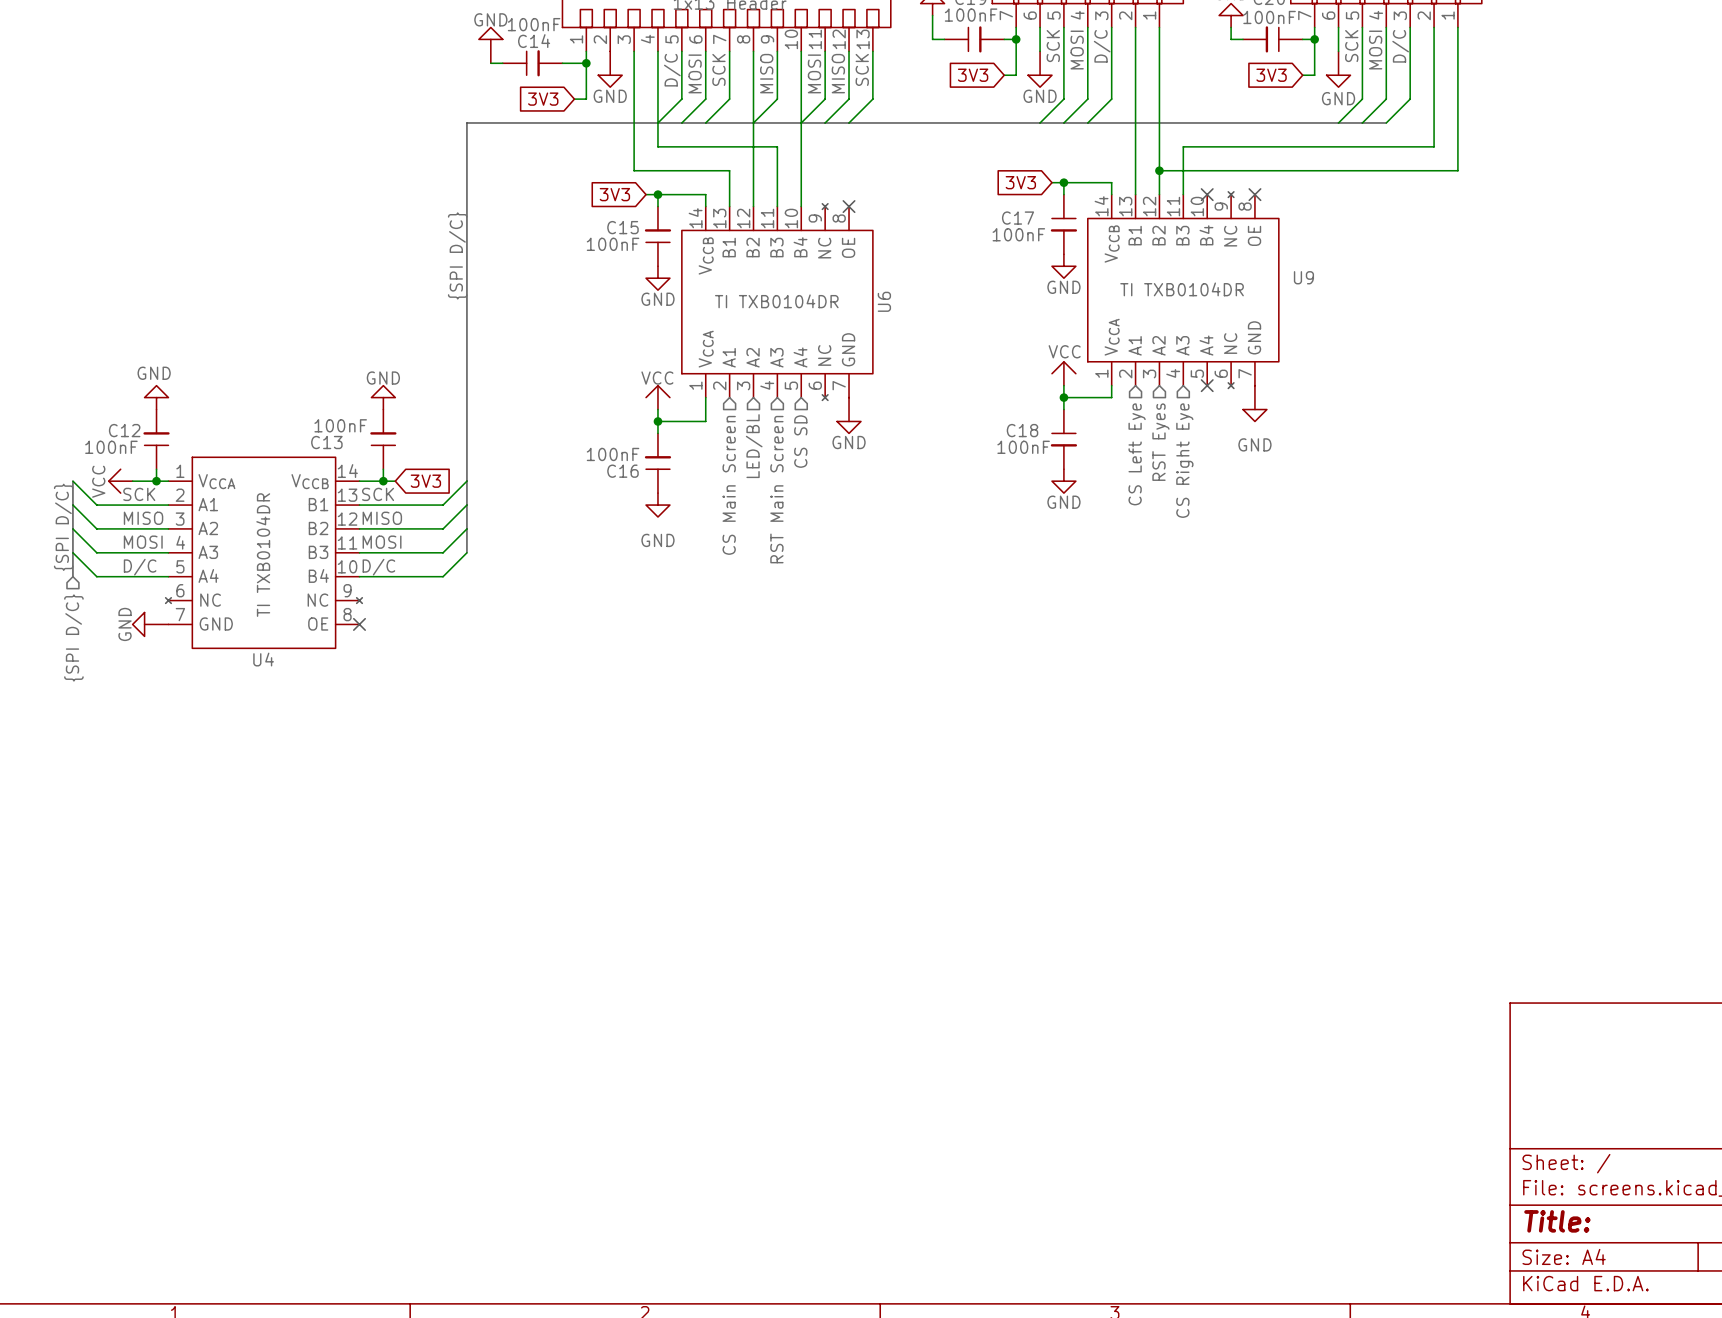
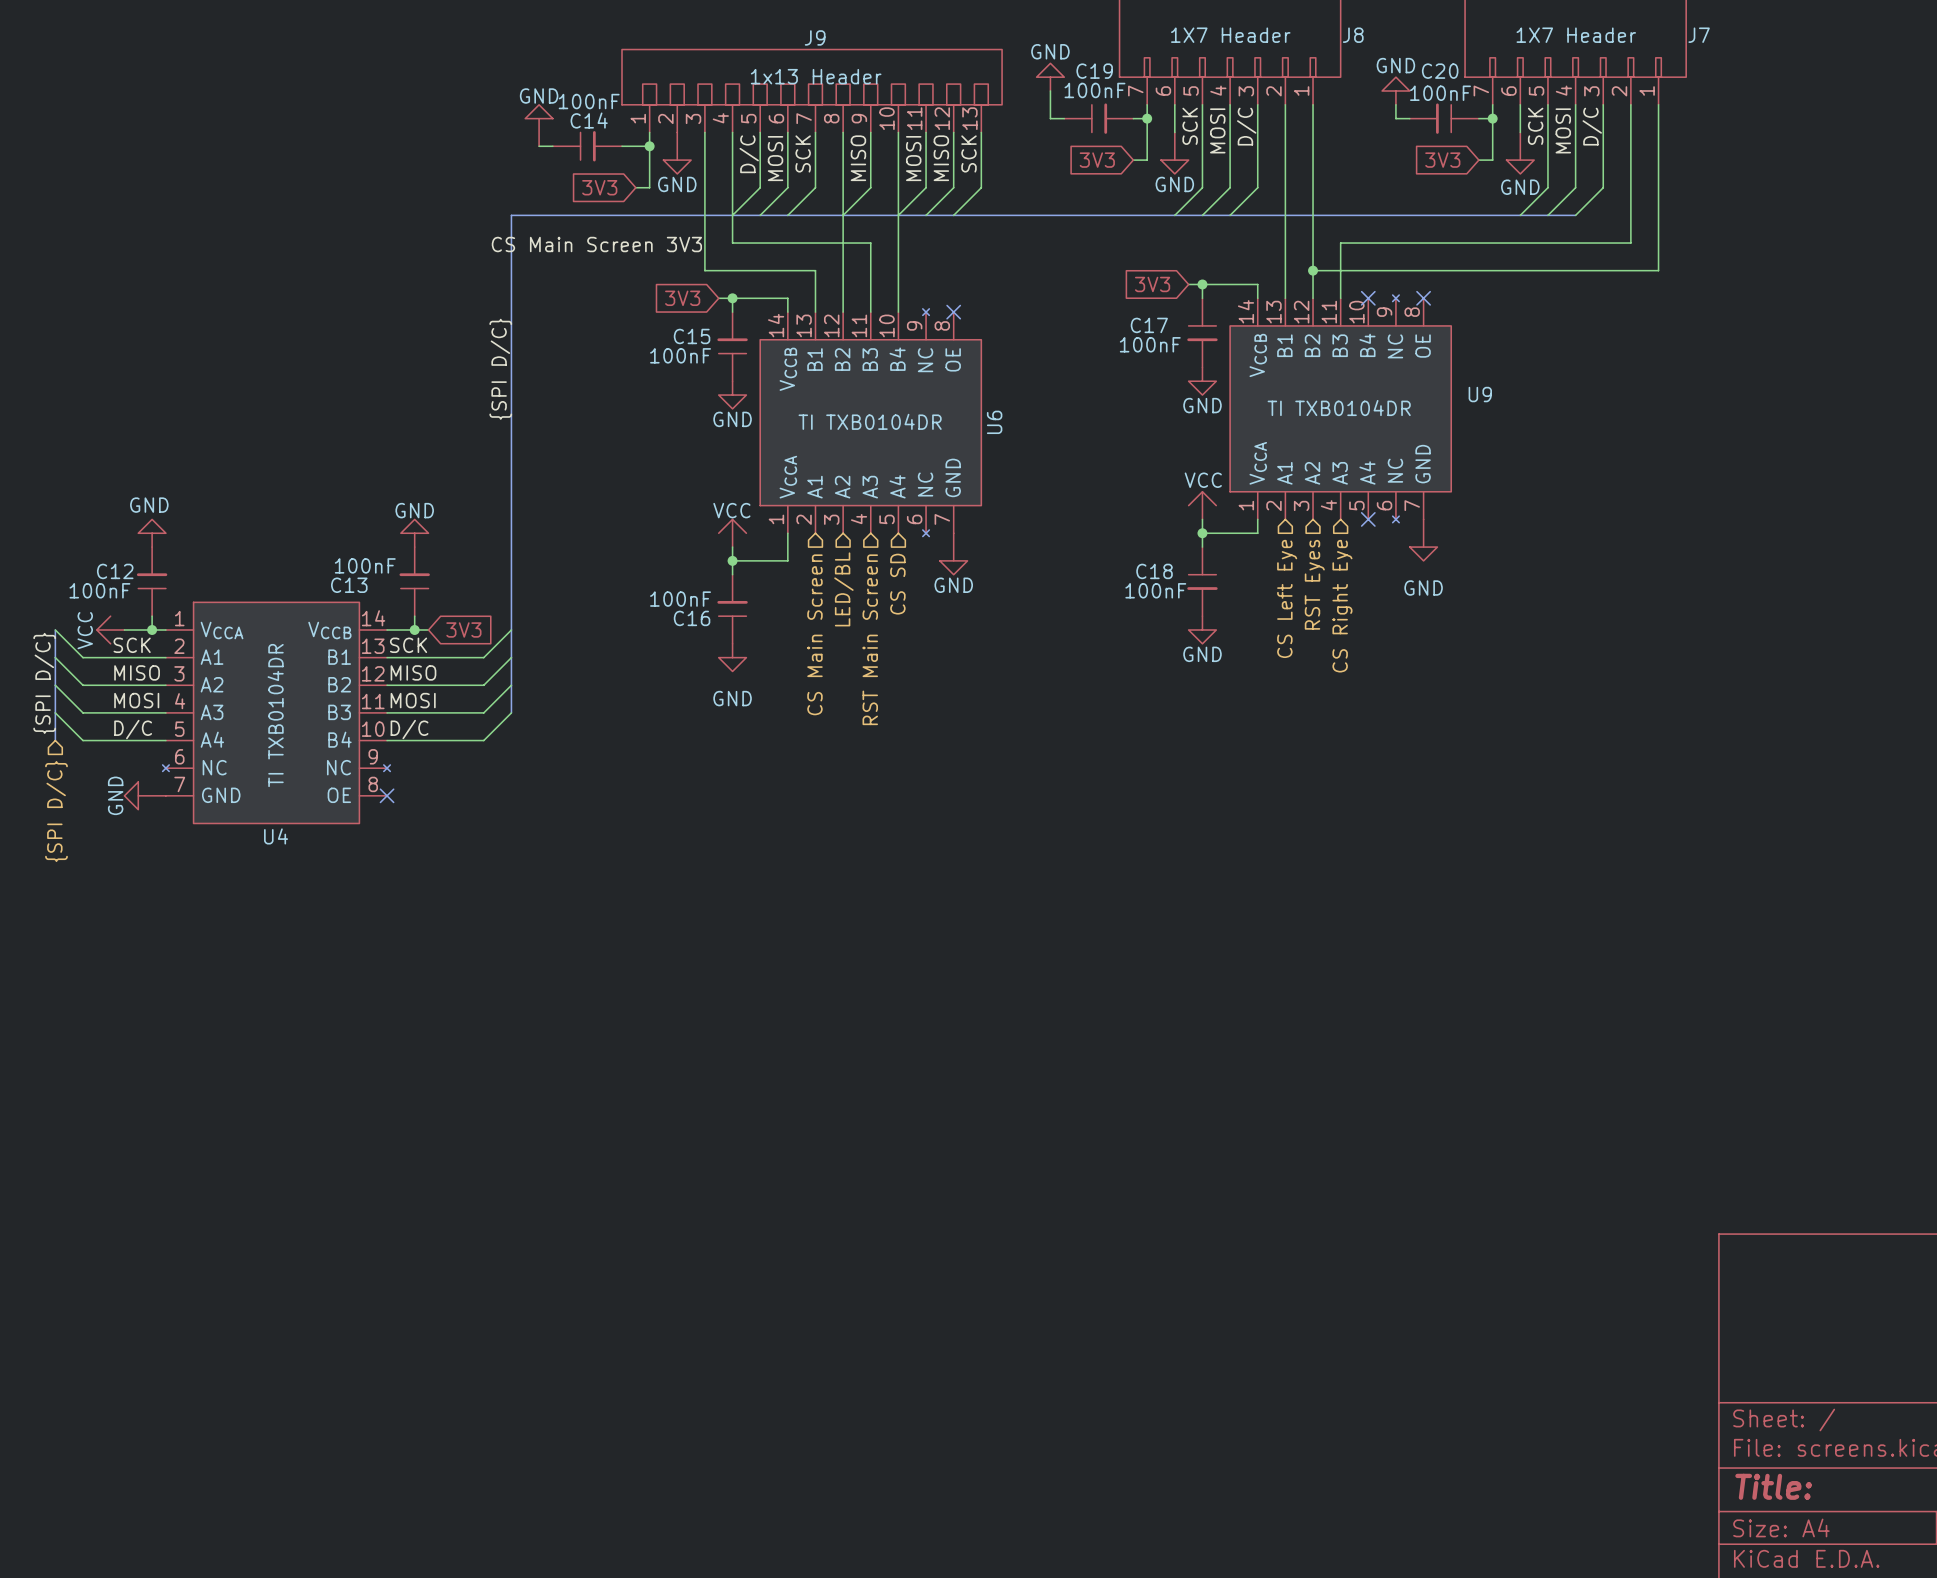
label: none -> CS Main Screen 3V3 (596, 244)

